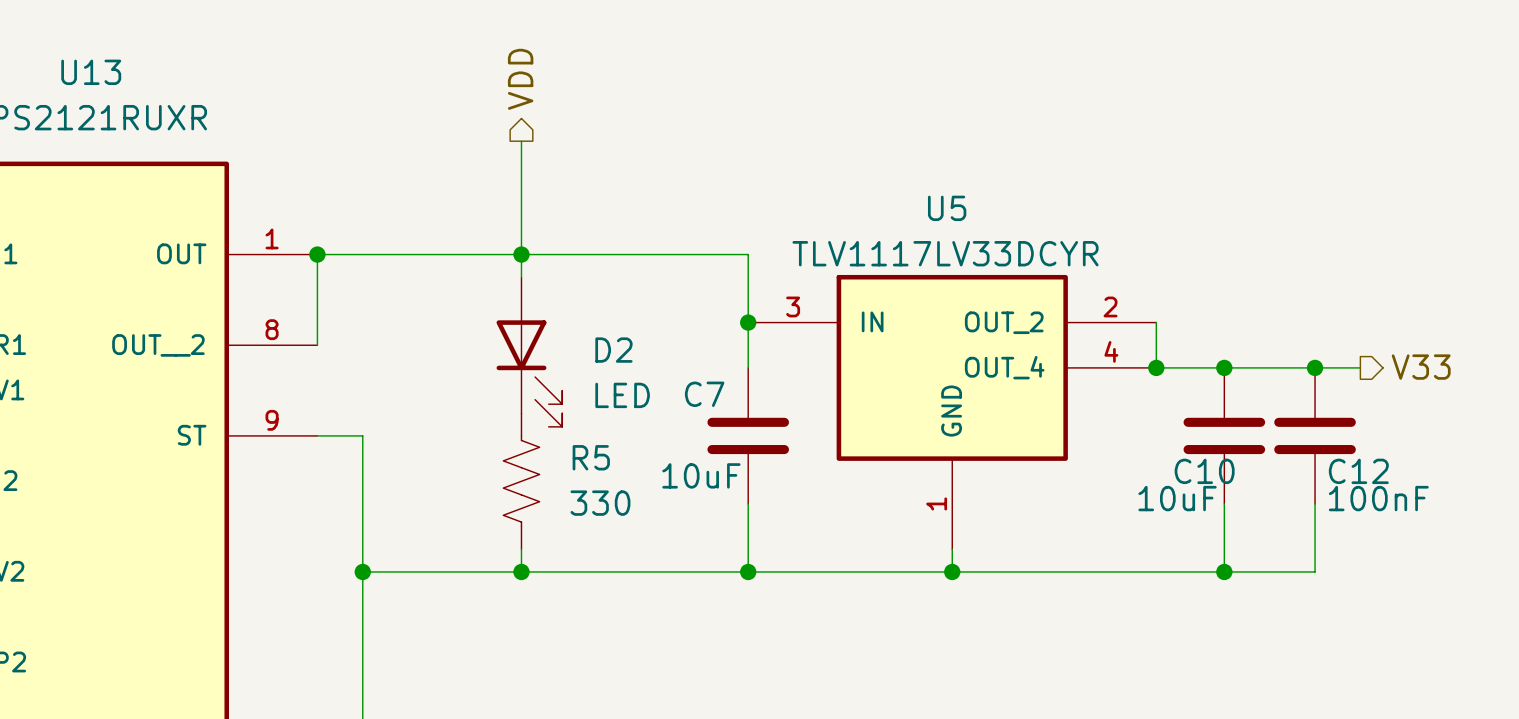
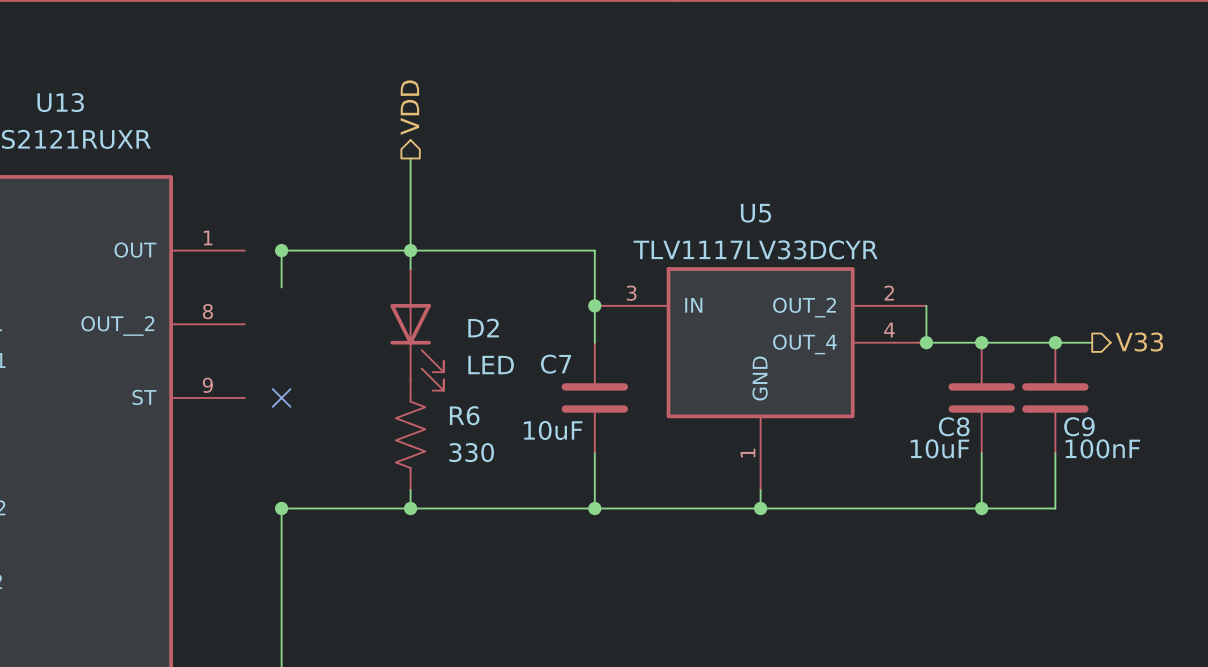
junction position: (317, 254) -> (281, 250)
wire: (362, 254) (317, 254) (317, 345) -> (281, 250) (281, 287)
wire: (317, 435) (362, 435) (362, 571) -> none
no-connect mark: none -> (281, 397)
R5 name: R5 (591, 457) -> R6 (464, 415)
C10 name: C10 (1204, 471) -> C8 (954, 426)
C12 name: C12 (1358, 471) -> C9 (1079, 426)

